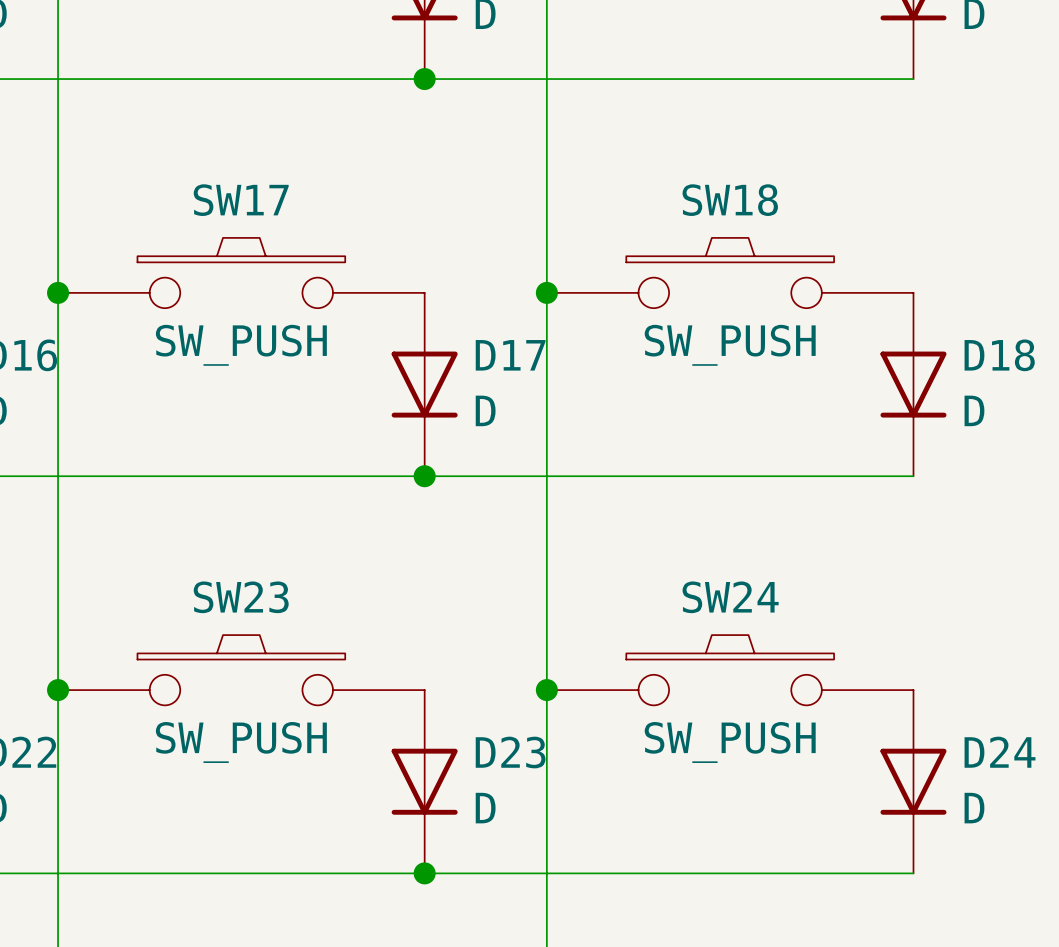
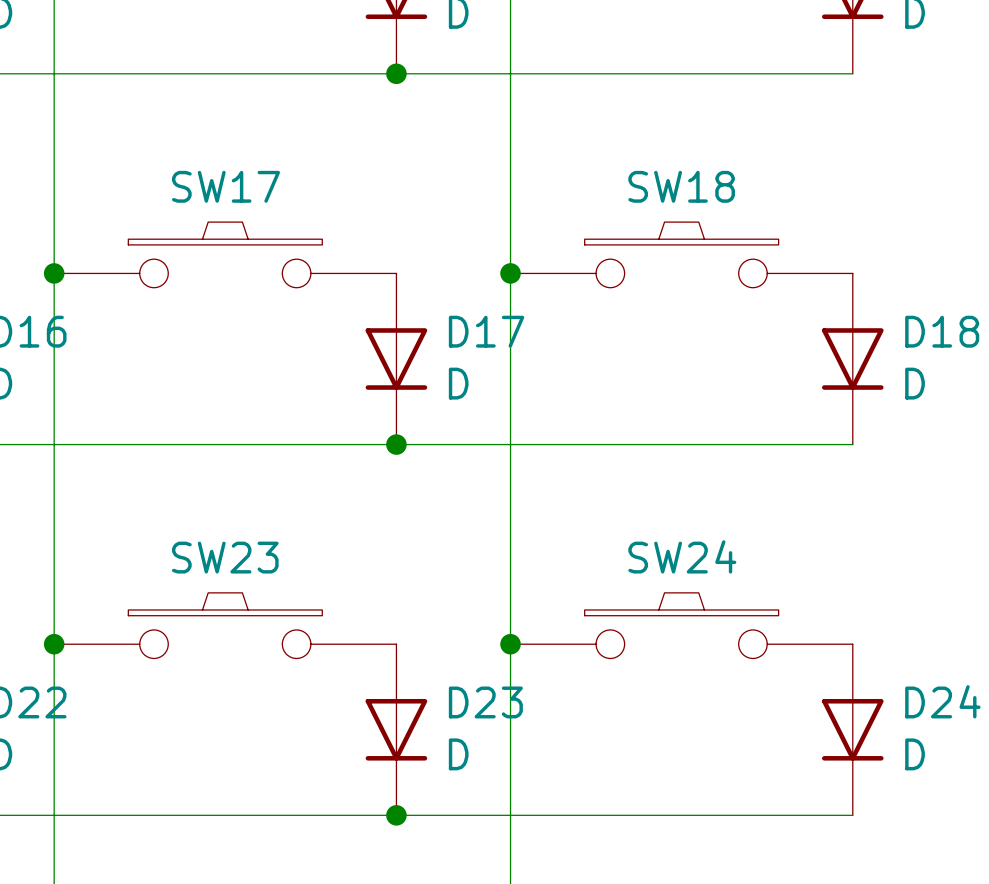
SW17 value: SW_PUSH (241, 345) -> none
SW18 value: SW_PUSH (730, 345) -> none
SW23 value: SW_PUSH (241, 742) -> none
SW24 value: SW_PUSH (730, 742) -> none

